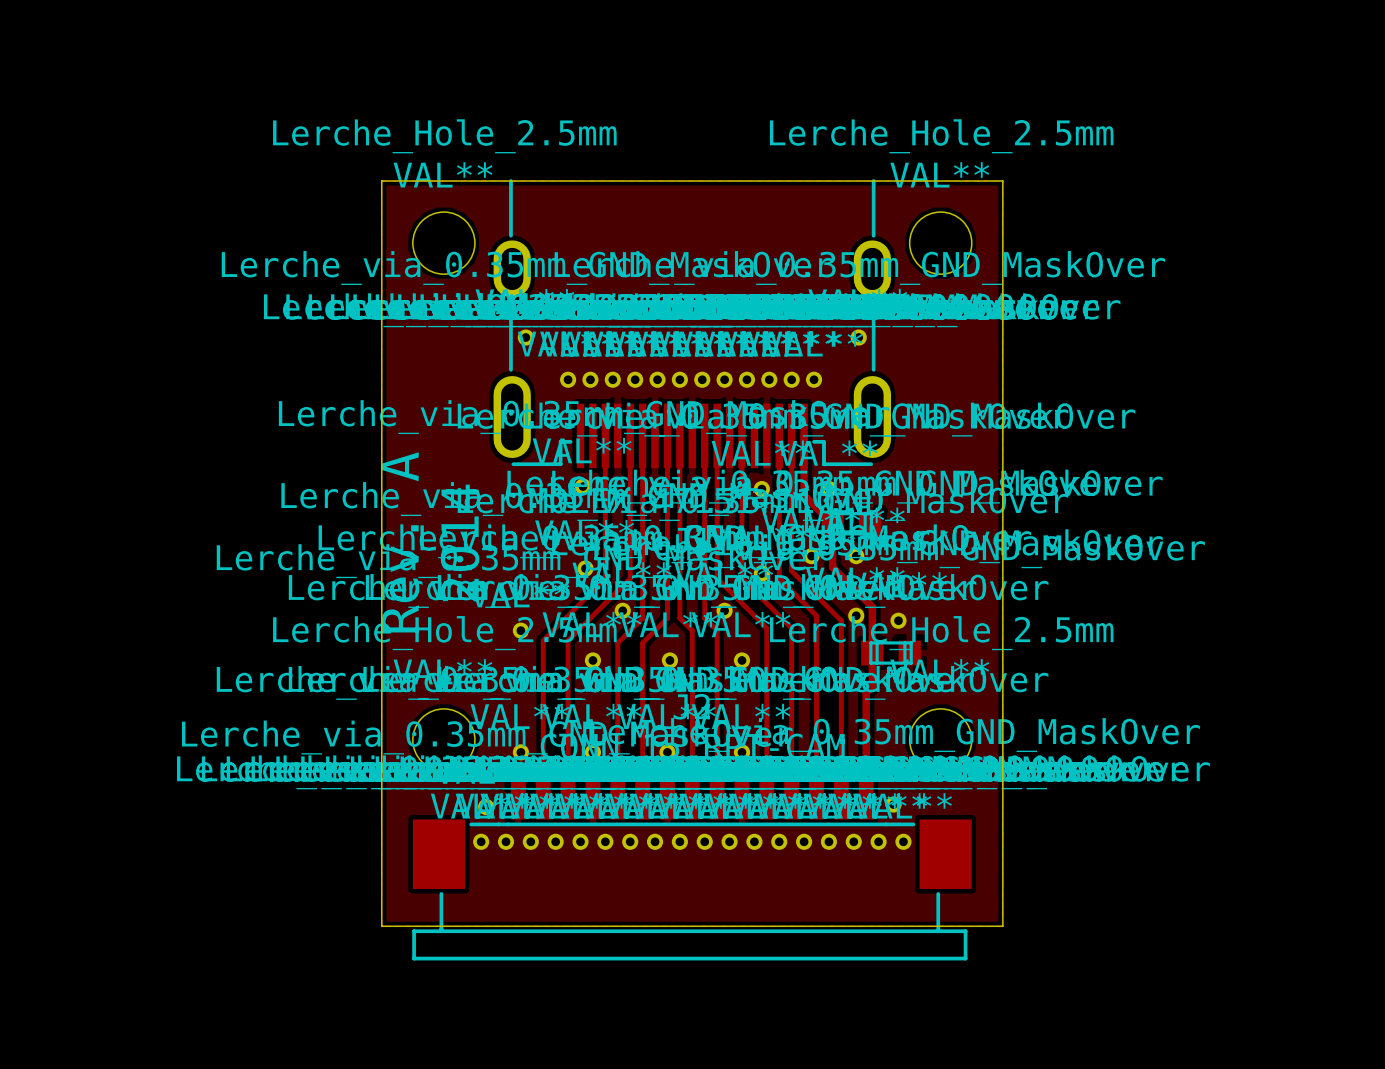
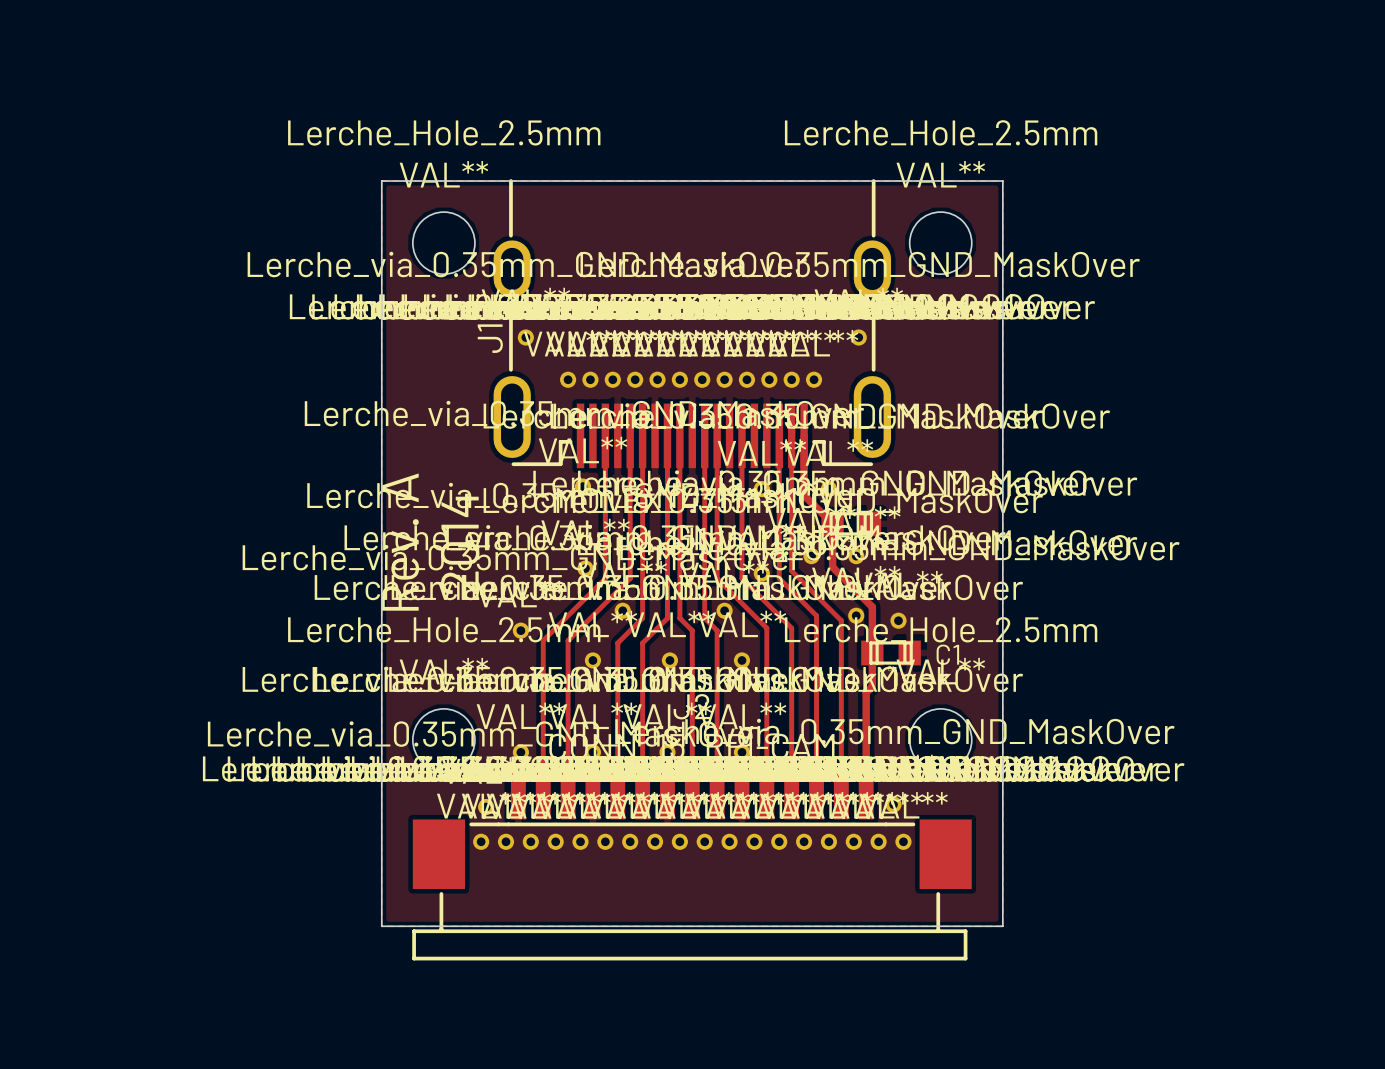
text: none -> J1 (490, 338)
text: none -> C1 (947, 654)

